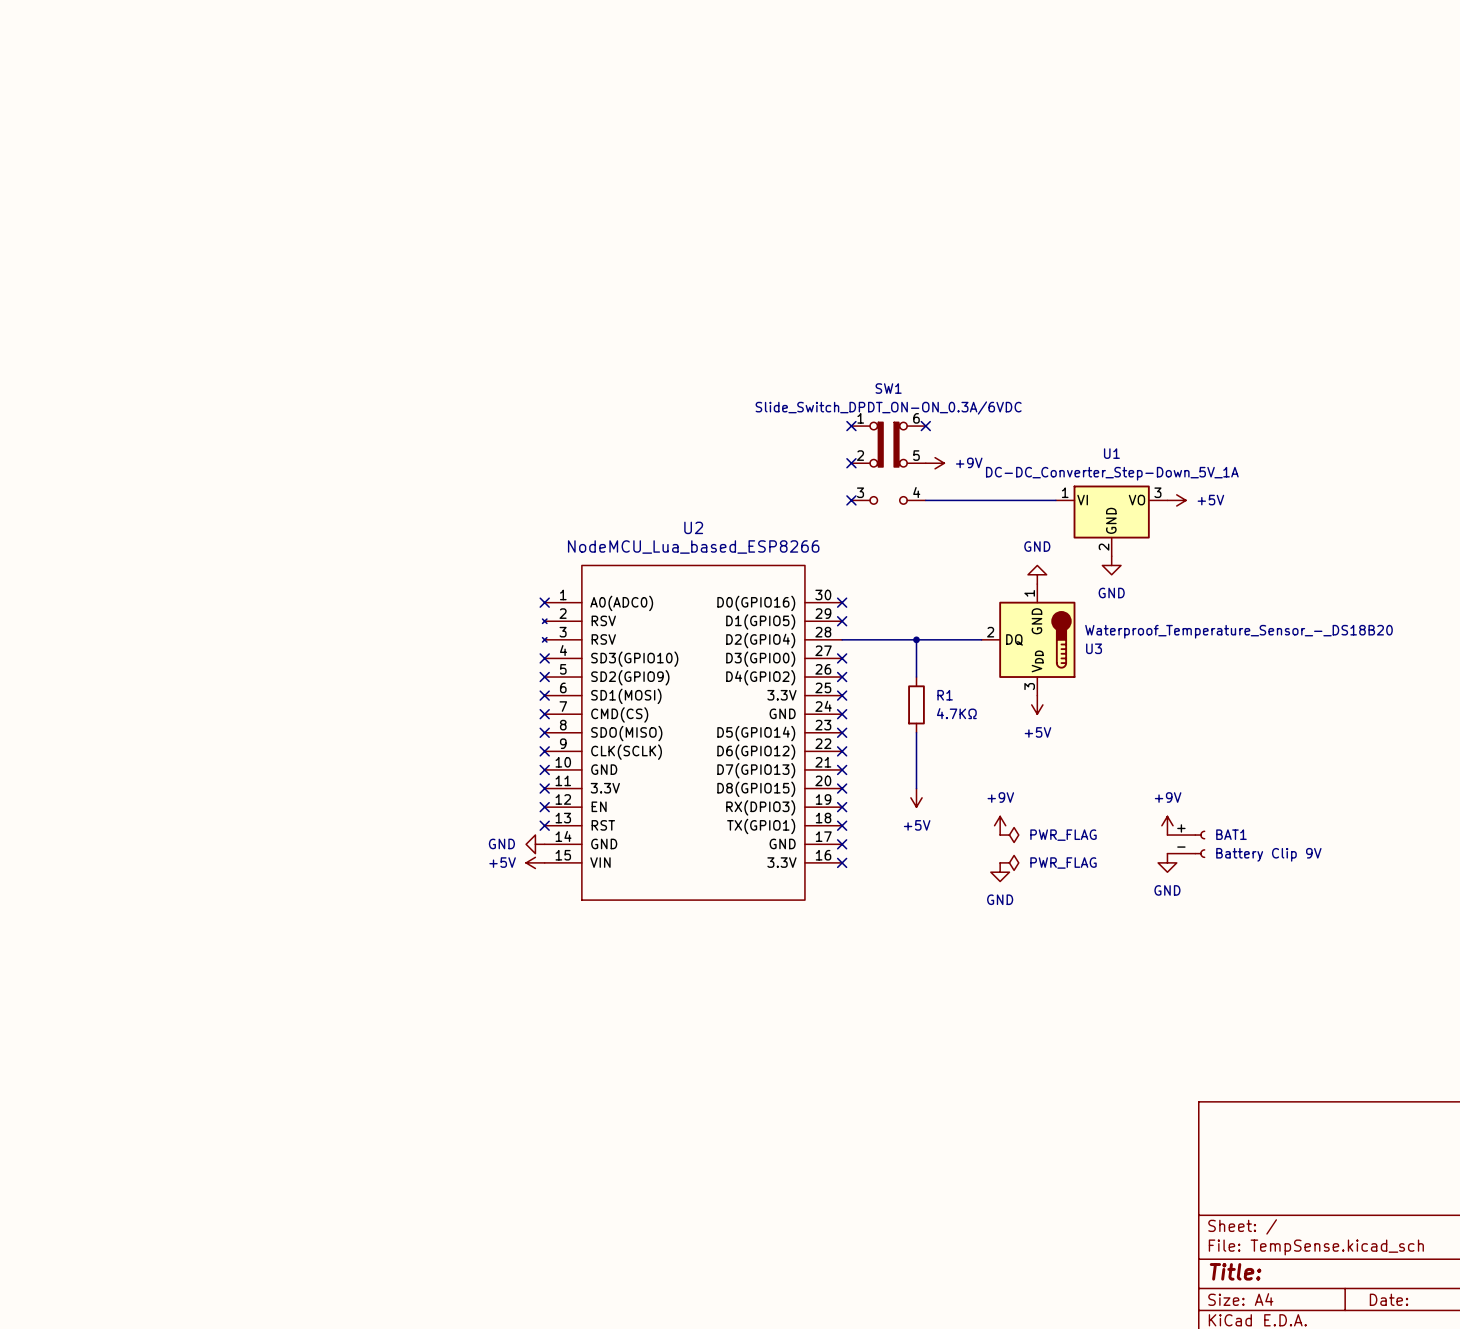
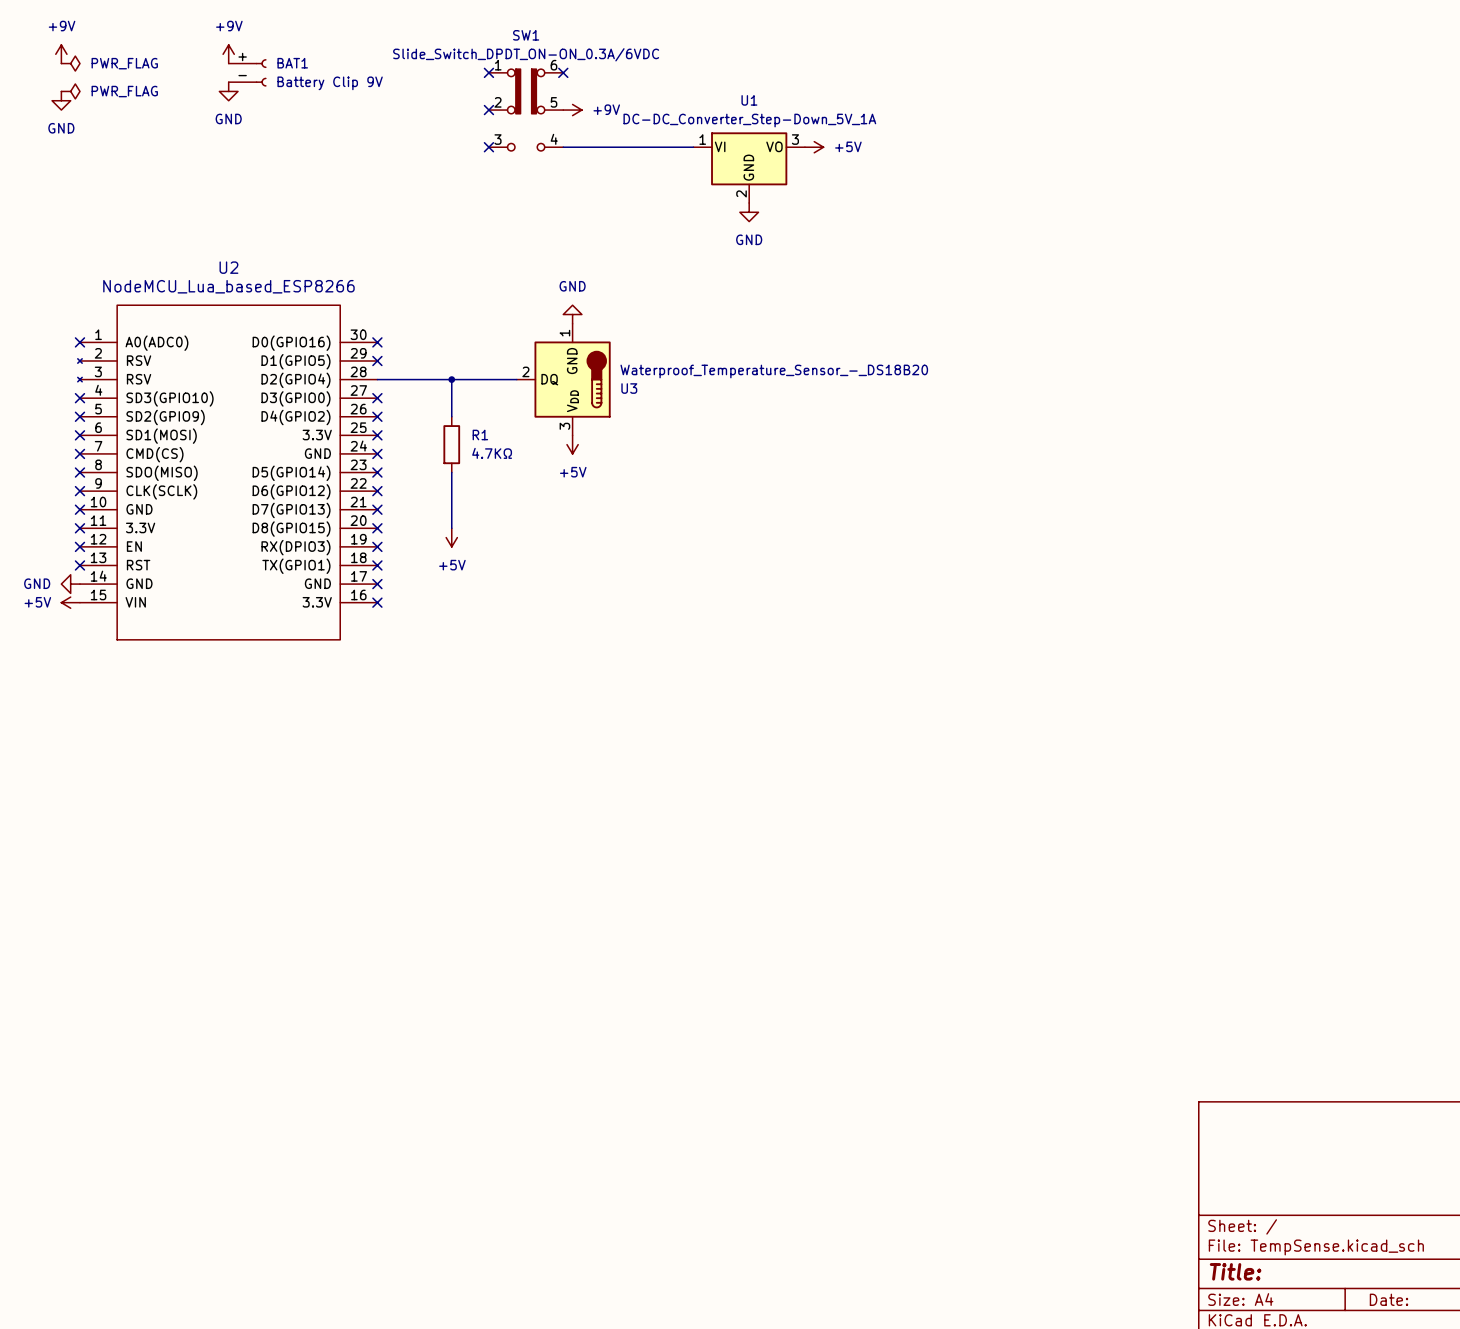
power symbol: none -> +9V (61, 54)
power symbol: none -> +9V (228, 54)
power symbol: none -> PWR_FLAG (70, 63)
no-connect mark: none -> (488, 72)
no-connect mark: none -> (563, 72)
power symbol: none -> PWR_FLAG (70, 91)
power symbol: none -> GND (228, 91)
power symbol: none -> GND (61, 100)
no-connect mark: none -> (488, 110)
power symbol: none -> +9V (572, 110)
no-connect mark: none -> (488, 147)
wire: none -> (563, 147) (693, 147)
power symbol: none -> +5V (814, 147)
power symbol: none -> GND (749, 212)
power symbol: none -> GND (572, 314)
no-connect mark: none -> (79, 342)
no-connect mark: none -> (377, 342)
no-connect mark: none -> (377, 360)
wire: none -> (377, 379) (516, 379)
wire: none -> (451, 379) (451, 416)
junction: none -> (451, 379)
no-connect mark: none -> (79, 398)
no-connect mark: none -> (377, 398)
no-connect mark: none -> (79, 416)
no-connect mark: none -> (377, 416)
no-connect mark: (851, 426) -> none
no-connect mark: (925, 426) -> none
no-connect mark: none -> (79, 435)
no-connect mark: none -> (377, 435)
power symbol: none -> +5V (572, 444)
no-connect mark: none -> (79, 453)
no-connect mark: none -> (377, 453)
no-connect mark: (851, 463) -> none
SW1 position: (888, 463) -> (526, 110)
power symbol: +9V (935, 463) -> none
no-connect mark: none -> (79, 472)
no-connect mark: none -> (377, 472)
wire: none -> (451, 472) (451, 528)
no-connect mark: none -> (79, 491)
no-connect mark: none -> (377, 491)
no-connect mark: (851, 500) -> none
wire: (925, 500) (1055, 500) -> none
power symbol: +5V (1176, 500) -> none
no-connect mark: none -> (79, 509)
no-connect mark: none -> (377, 509)
U1 position: (1111, 520) -> (749, 167)
no-connect mark: none -> (79, 528)
no-connect mark: none -> (377, 528)
power symbol: none -> +5V (451, 537)
no-connect mark: none -> (79, 546)
no-connect mark: none -> (377, 546)
no-connect mark: none -> (79, 565)
no-connect mark: none -> (377, 565)
power symbol: GND (1111, 565) -> none
power symbol: GND (1037, 574) -> none
power symbol: none -> GND (70, 584)
no-connect mark: none -> (377, 584)
power symbol: none -> +5V (70, 602)
no-connect mark: none -> (377, 602)
no-connect mark: (544, 602) -> none
no-connect mark: (842, 602) -> none
no-connect mark: (842, 621) -> none
wire: (842, 639) (981, 639) -> none
wire: (916, 639) (916, 677) -> none
junction: (916, 639) -> none
U3 position: (1028, 639) -> (563, 379)
no-connect mark: (544, 658) -> none
no-connect mark: (842, 658) -> none
no-connect mark: (544, 677) -> none
no-connect mark: (842, 677) -> none
no-connect mark: (544, 695) -> none
no-connect mark: (842, 695) -> none
R1 position: (916, 704) -> (451, 444)
power symbol: +5V (1037, 704) -> none
no-connect mark: (544, 714) -> none
no-connect mark: (842, 714) -> none
no-connect mark: (544, 732) -> none
U2 position: (692, 732) -> (227, 472)
no-connect mark: (842, 732) -> none
wire: (916, 732) (916, 788) -> none
no-connect mark: (544, 751) -> none
no-connect mark: (842, 751) -> none
no-connect mark: (544, 769) -> none
no-connect mark: (842, 769) -> none
no-connect mark: (544, 788) -> none
no-connect mark: (842, 788) -> none
power symbol: +5V (916, 797) -> none
no-connect mark: (544, 807) -> none
no-connect mark: (842, 807) -> none
no-connect mark: (544, 825) -> none
no-connect mark: (842, 825) -> none
power symbol: +9V (1000, 825) -> none
power symbol: +9V (1167, 825) -> none
power symbol: PWR_FLAG (1009, 835) -> none
power symbol: GND (535, 844) -> none
no-connect mark: (842, 844) -> none
BAT1 position: (1186, 844) -> (247, 72)
power symbol: +5V (535, 862) -> none
no-connect mark: (842, 862) -> none
power symbol: PWR_FLAG (1009, 862) -> none
power symbol: GND (1167, 862) -> none
power symbol: GND (1000, 872) -> none

